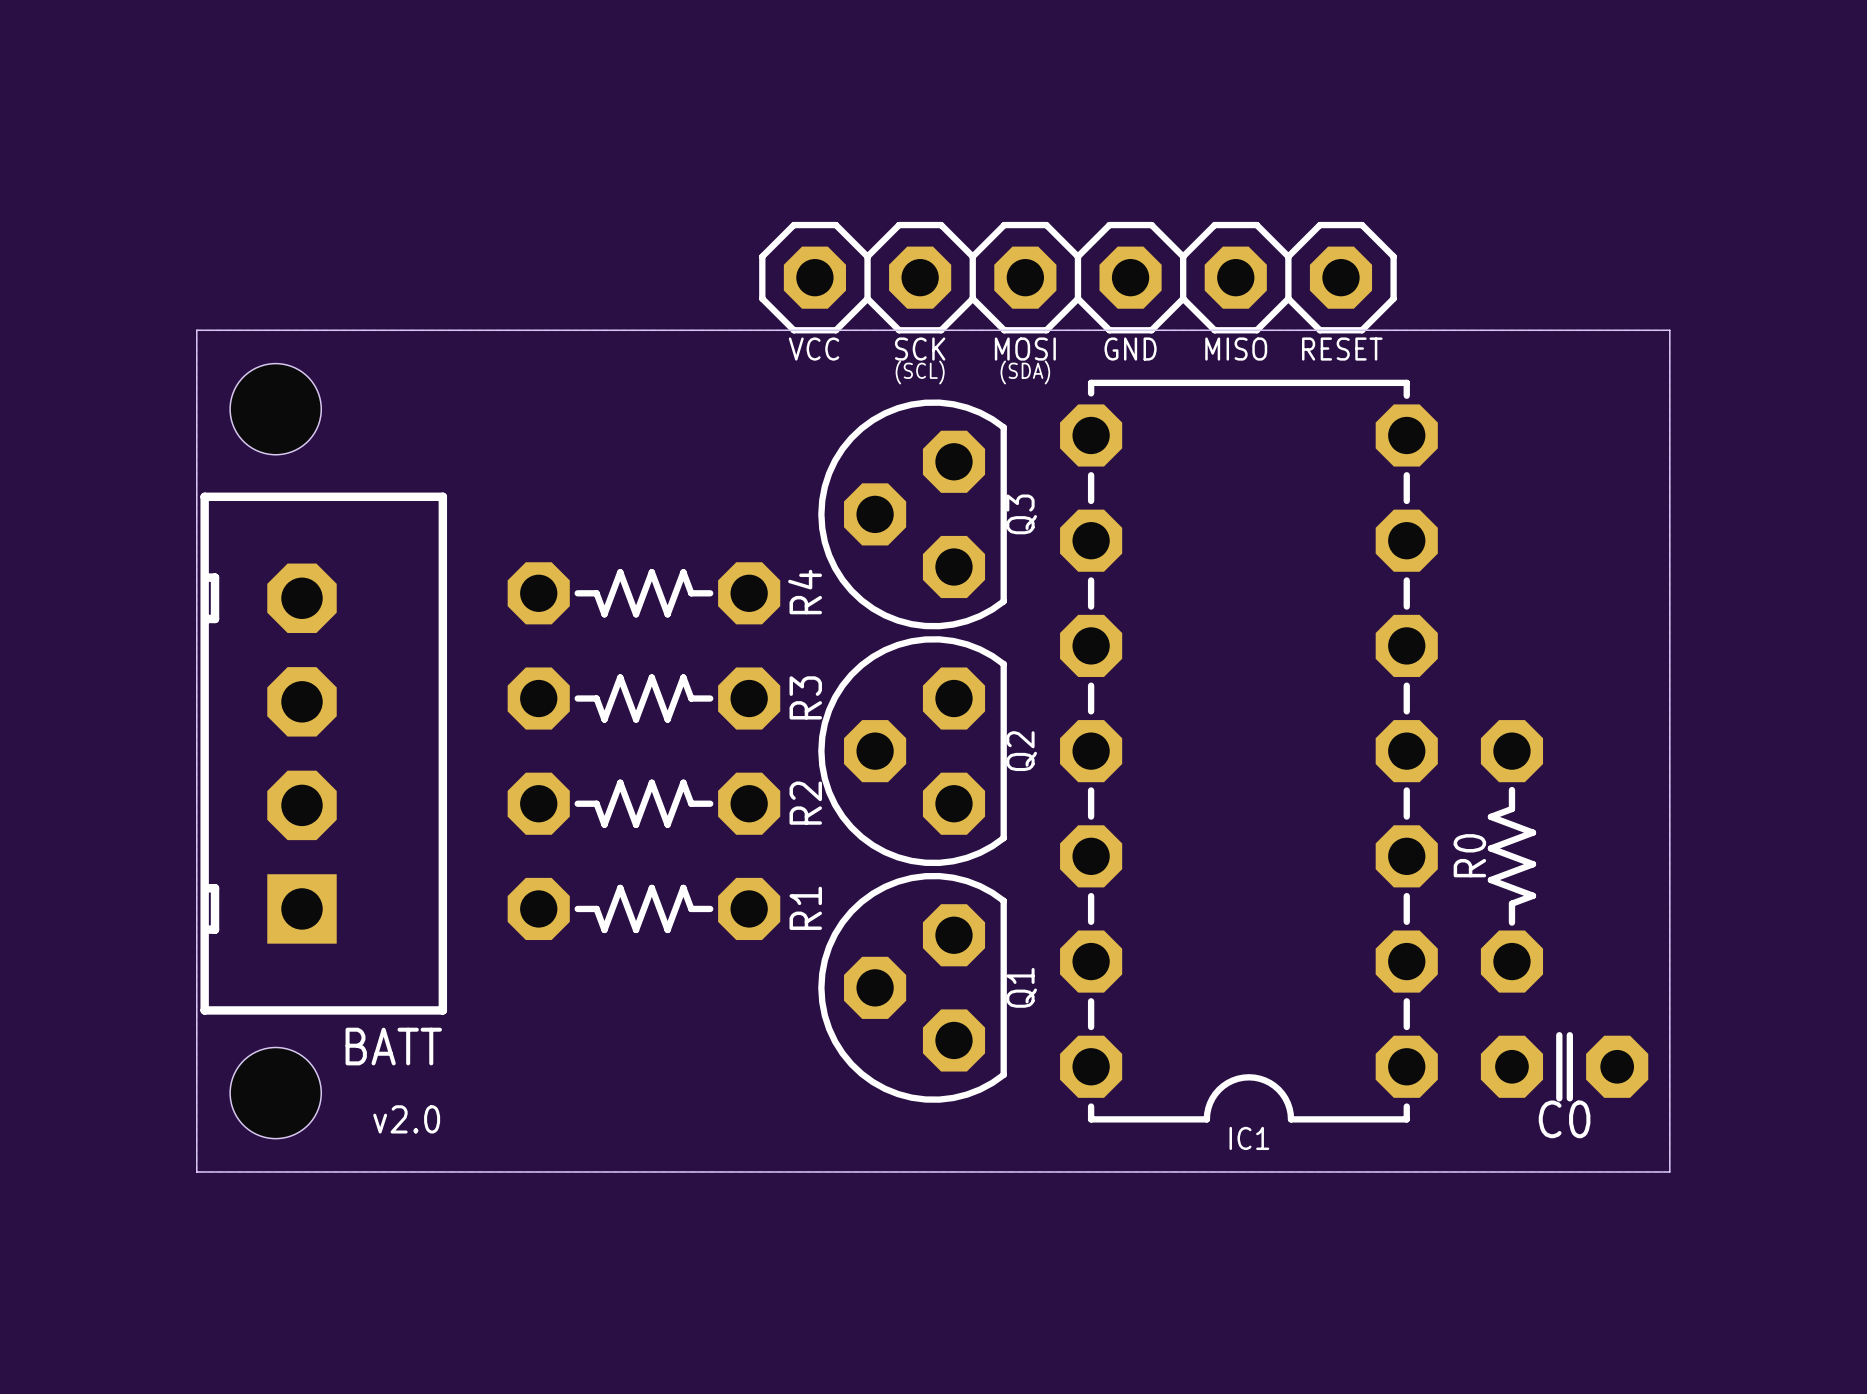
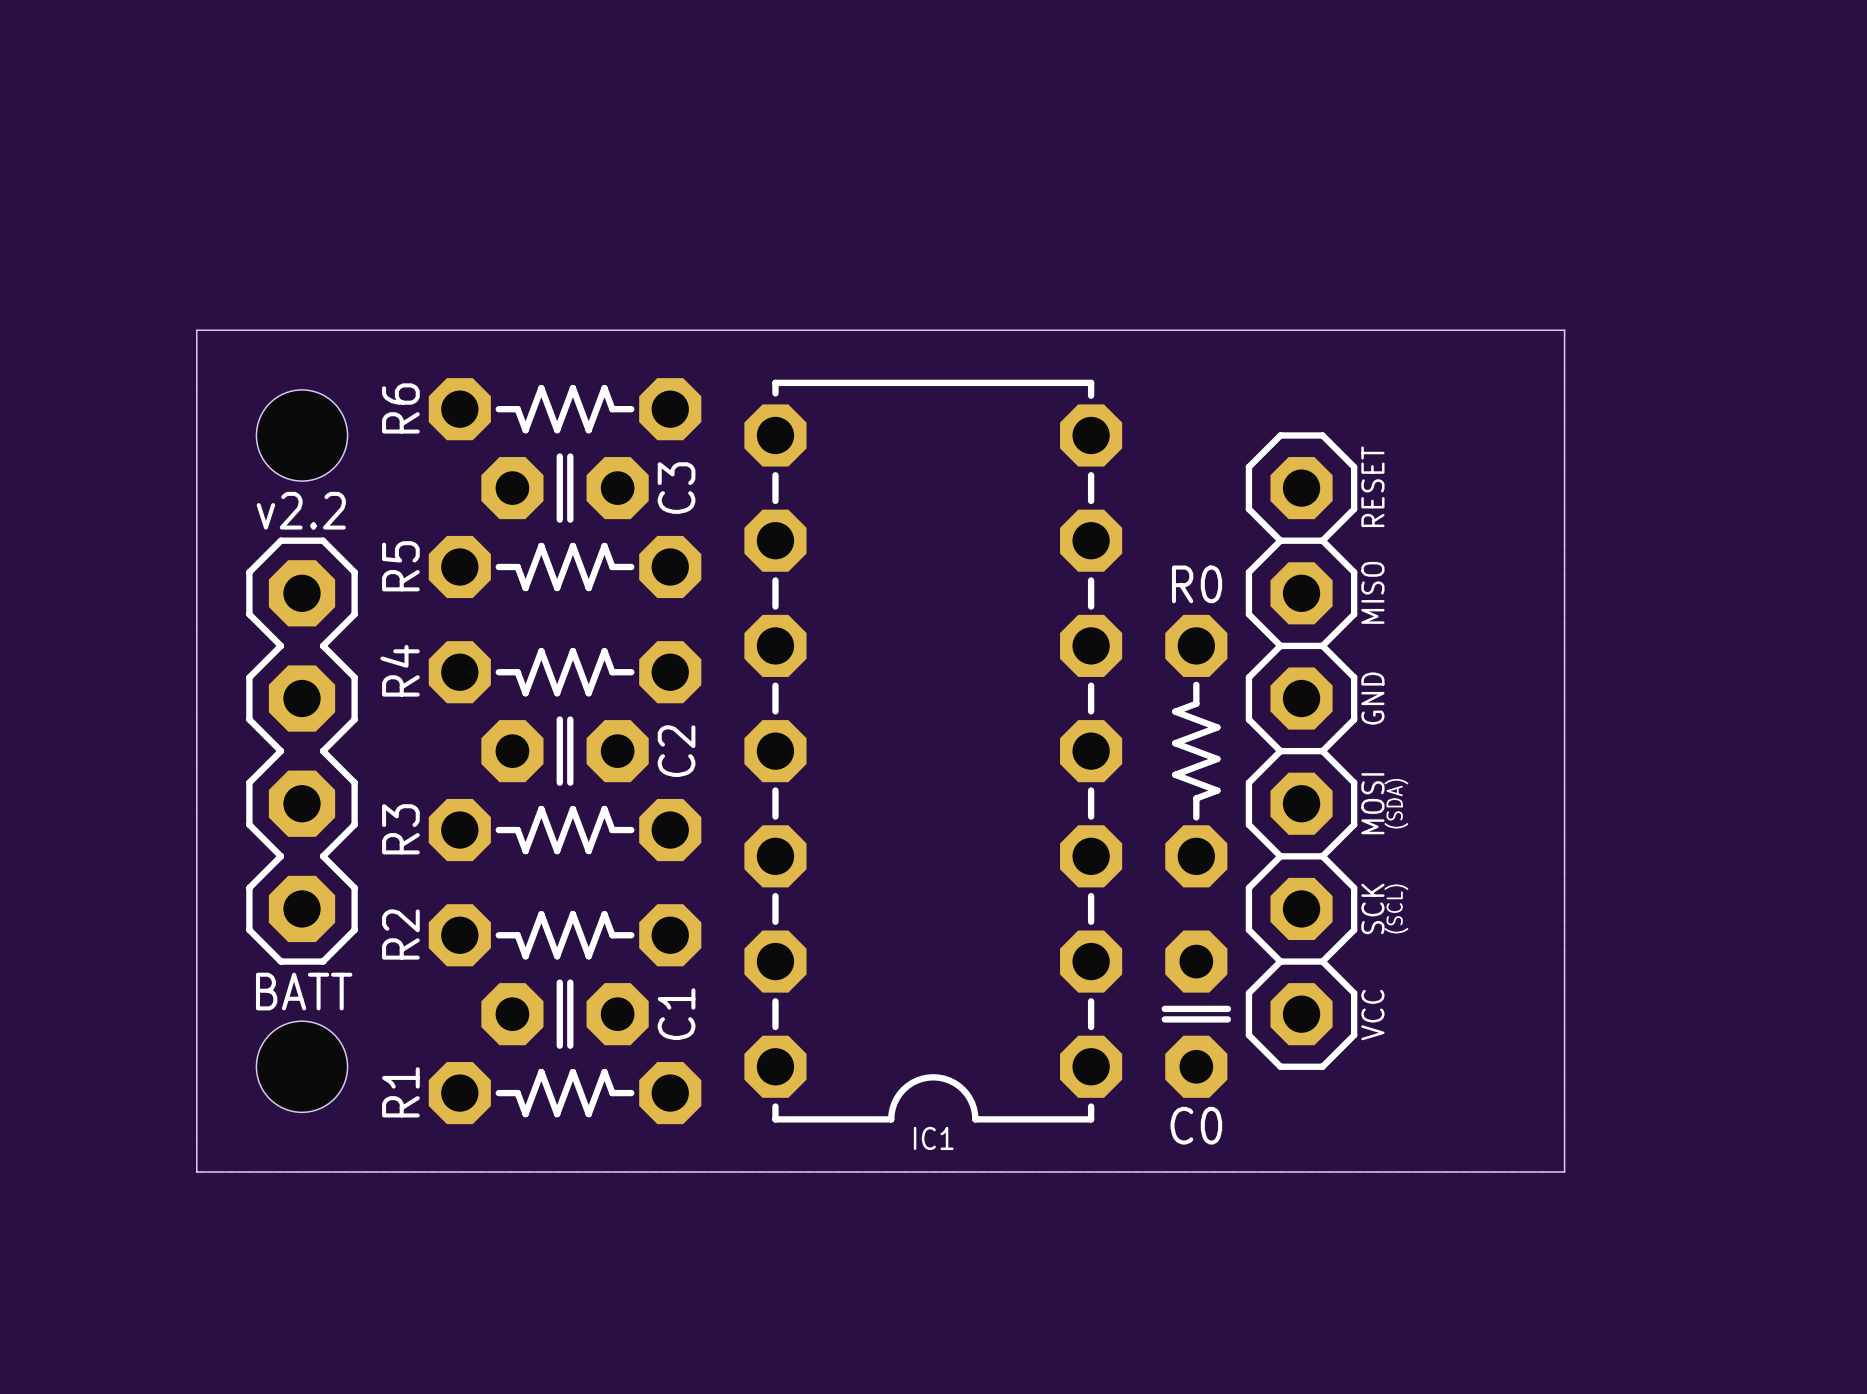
part rotation: 0° (1077, 277) -> 90° counterclockwise (1301, 751)
part position: (1077, 277) -> (1301, 751)
board edge: (1564, 330) (1669, 330) (1669, 1171) (1564, 1171) -> (1564, 330) (1564, 1171)
hole position: (275, 409) -> (302, 435)
R6: none -> (565, 409)
C3: none -> (565, 488)
BATT footprint: [200, 492, 448, 1015] -> [246, 537, 358, 965]
text: none -> v2.2 (301, 510)
Q3: (912, 514) -> none
R5: none -> (565, 567)
R4 name position: R4 (805, 592) -> R4 (400, 670)
R4 position: (643, 593) -> (565, 672)
R3 name position: R3 (805, 697) -> R3 (400, 829)
R3 position: (643, 698) -> (565, 830)
C2: none -> (565, 751)
Q2: (912, 751) -> none
IC1 position: (1248, 751) -> (933, 751)
R2 position: (643, 803) -> (565, 935)
R2 name position: R2 (805, 803) -> R2 (400, 934)
R0 name rotation: 0° (1469, 855) -> 90° clockwise (1197, 584)
R0 name position: R0 (1469, 855) -> R0 (1197, 584)
R0 position: (1511, 856) -> (1196, 751)
R1 position: (643, 908) -> (565, 1093)
R1 name position: R1 (805, 908) -> R1 (400, 1092)
Q1: (912, 987) -> none
C1: none -> (565, 1014)
BATT name position: BATT (393, 1046) -> BATT (304, 991)
C0 rotation: 0° (1564, 1066) -> 90° clockwise (1196, 1014)
C0 position: (1564, 1066) -> (1196, 1014)
hole position: (275, 1093) -> (302, 1066)
text: v2.0 (406, 1119) -> none

